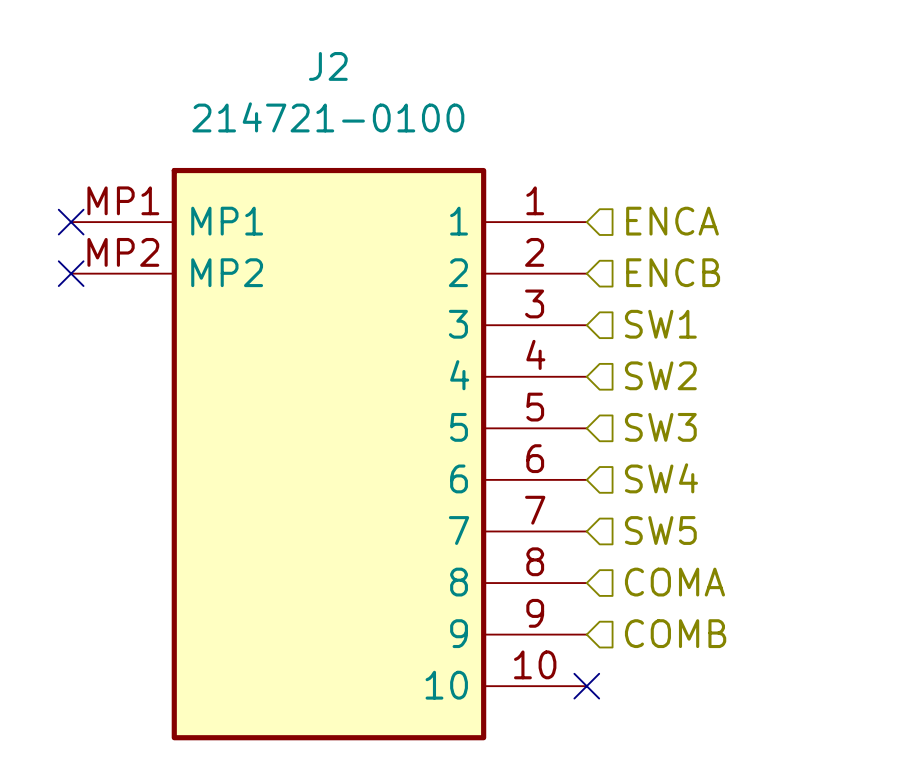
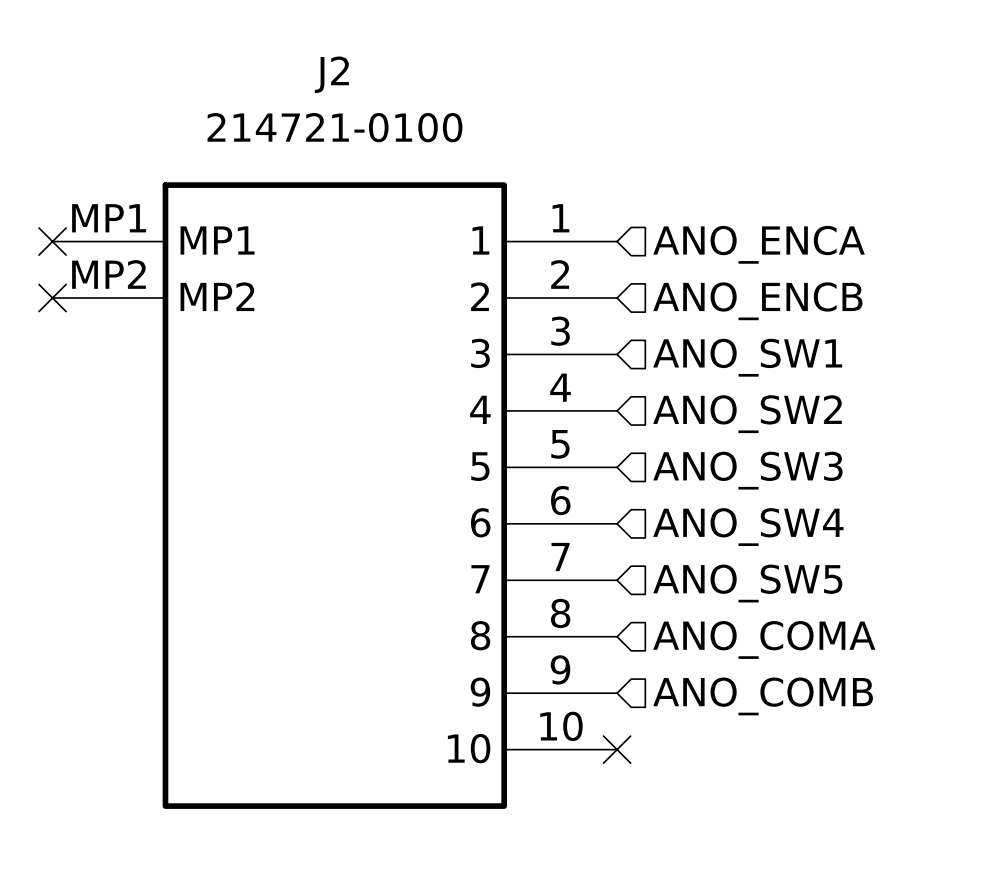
hierarchical label: ENCA (672, 221) -> ANO_ENCA (759, 244)
hierarchical label: ENCB (673, 272) -> ANO_ENCB (757, 301)
hierarchical label: SW1 (660, 324) -> ANO_SW1 (747, 357)
hierarchical label: SW2 (660, 375) -> ANO_SW2 (747, 414)
hierarchical label: SW3 (660, 427) -> ANO_SW3 (747, 470)
hierarchical label: SW4 (661, 478) -> ANO_SW4 (748, 527)
hierarchical label: SW5 (660, 530) -> ANO_SW5 (747, 583)
hierarchical label: COMA (674, 582) -> ANO_COMA (764, 639)
hierarchical label: COMB (675, 633) -> ANO_COMB (763, 696)

